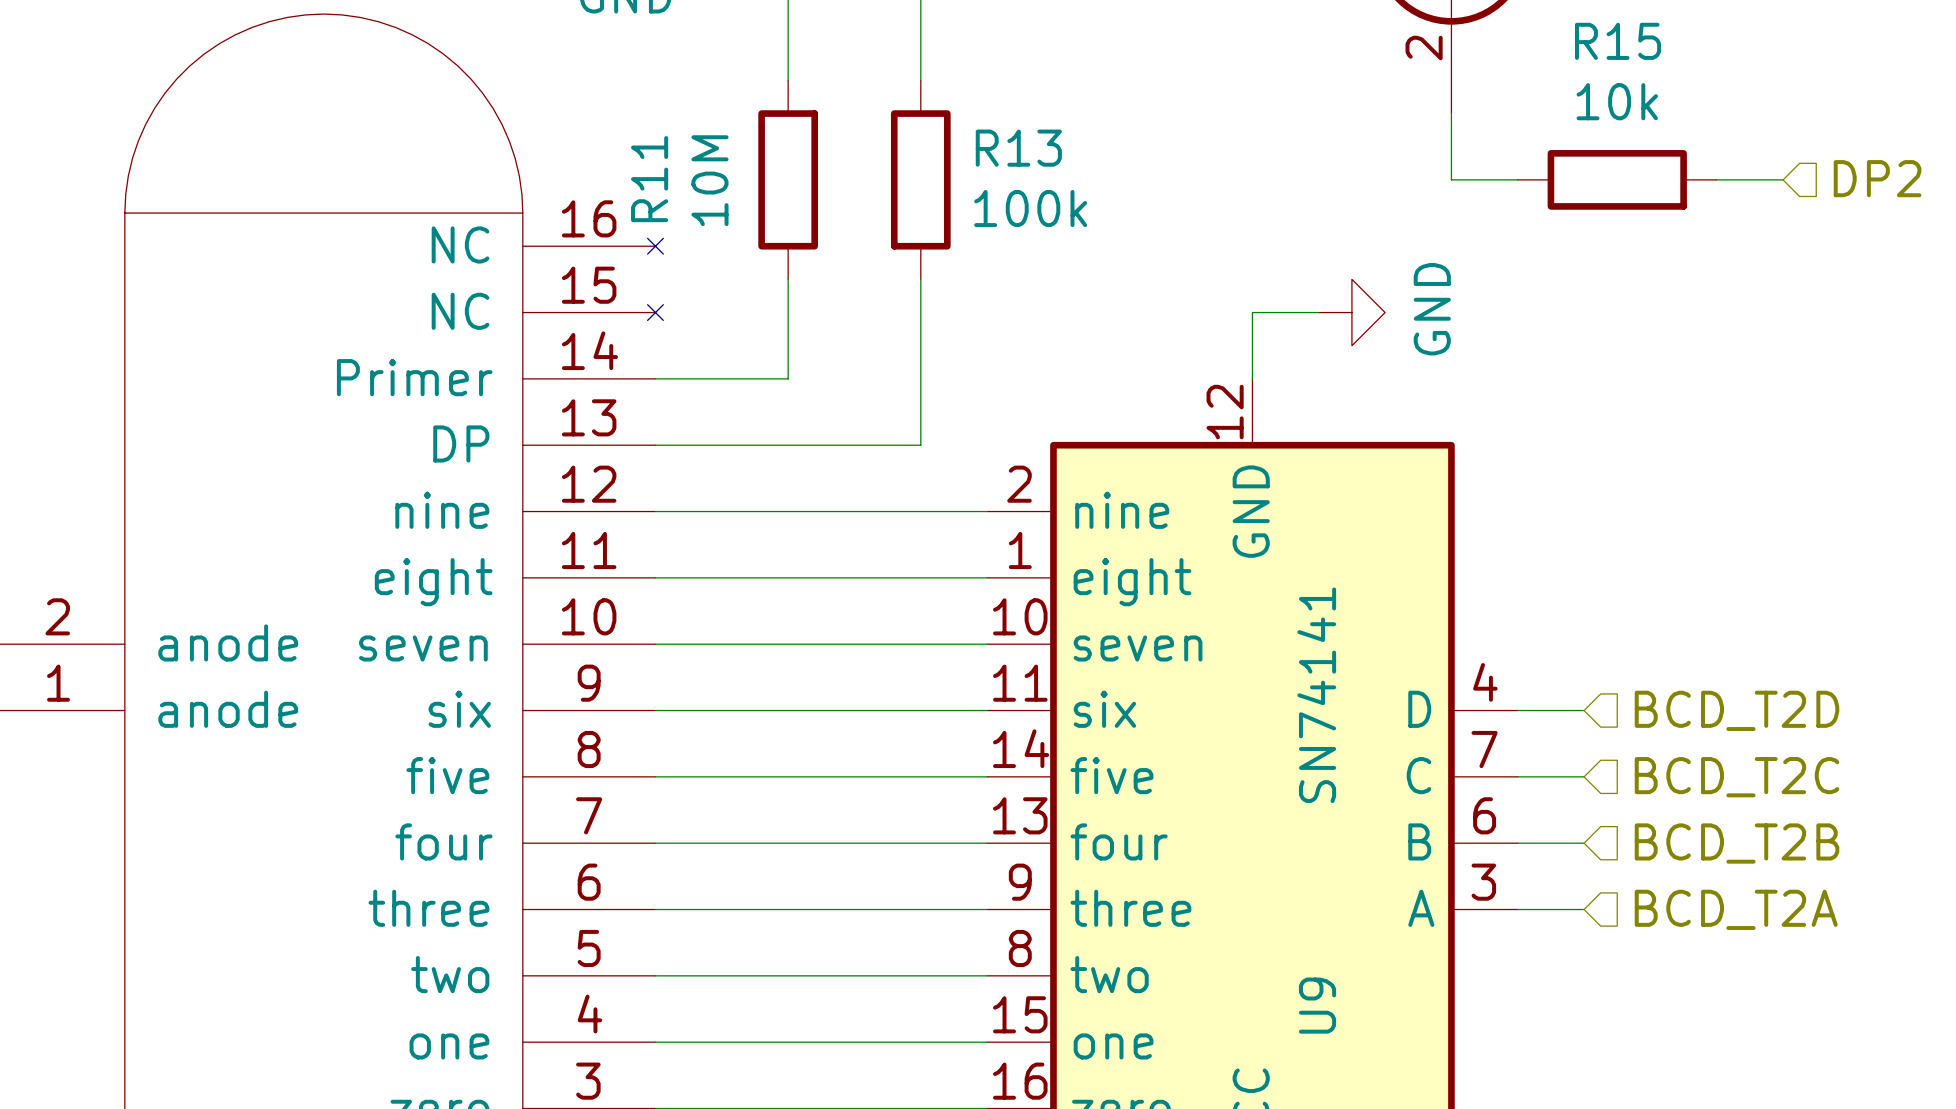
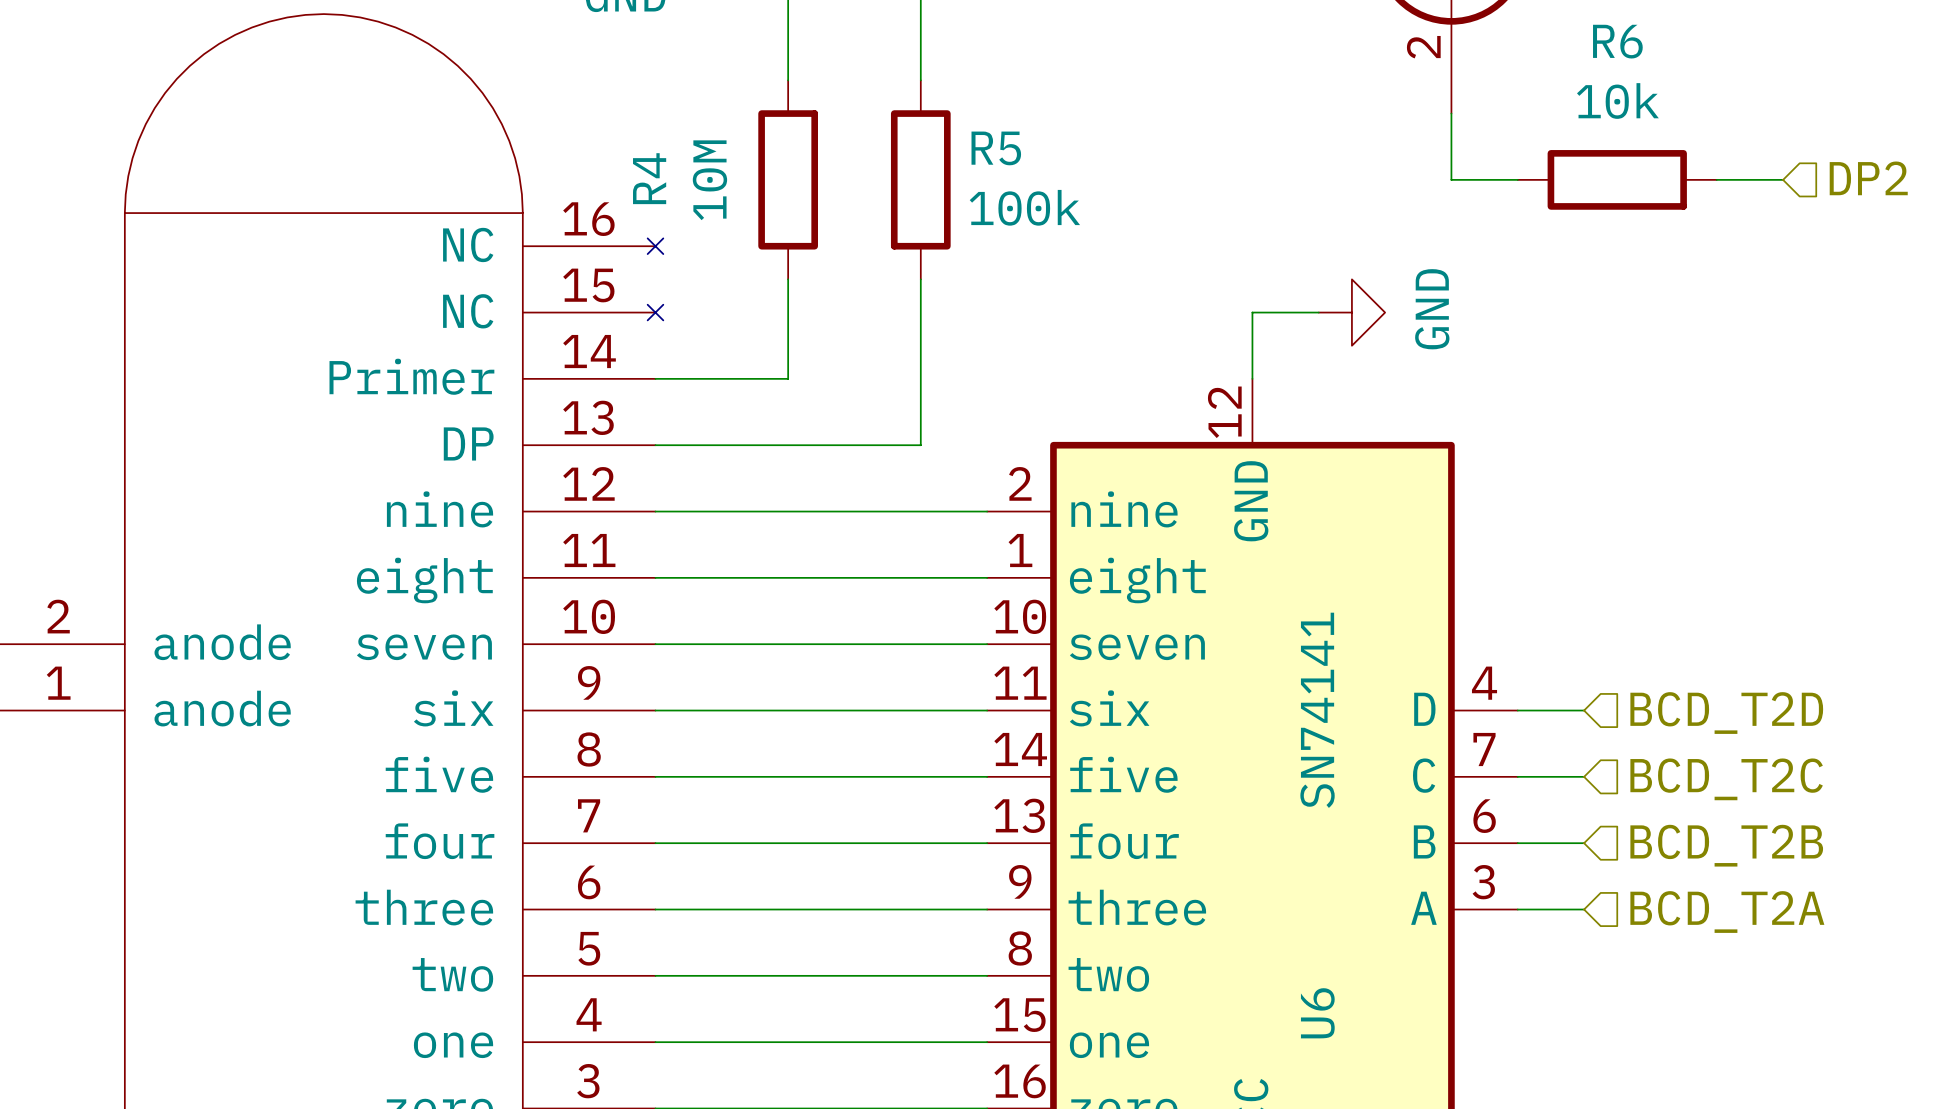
R15 name: R15 (1618, 41) -> R6 (1617, 41)
R13 name: R13 (1018, 148) -> R5 (996, 148)
R11 name: R11 (649, 179) -> R4 (649, 178)
U9 name: U9 (1317, 1005) -> U6 (1317, 1013)

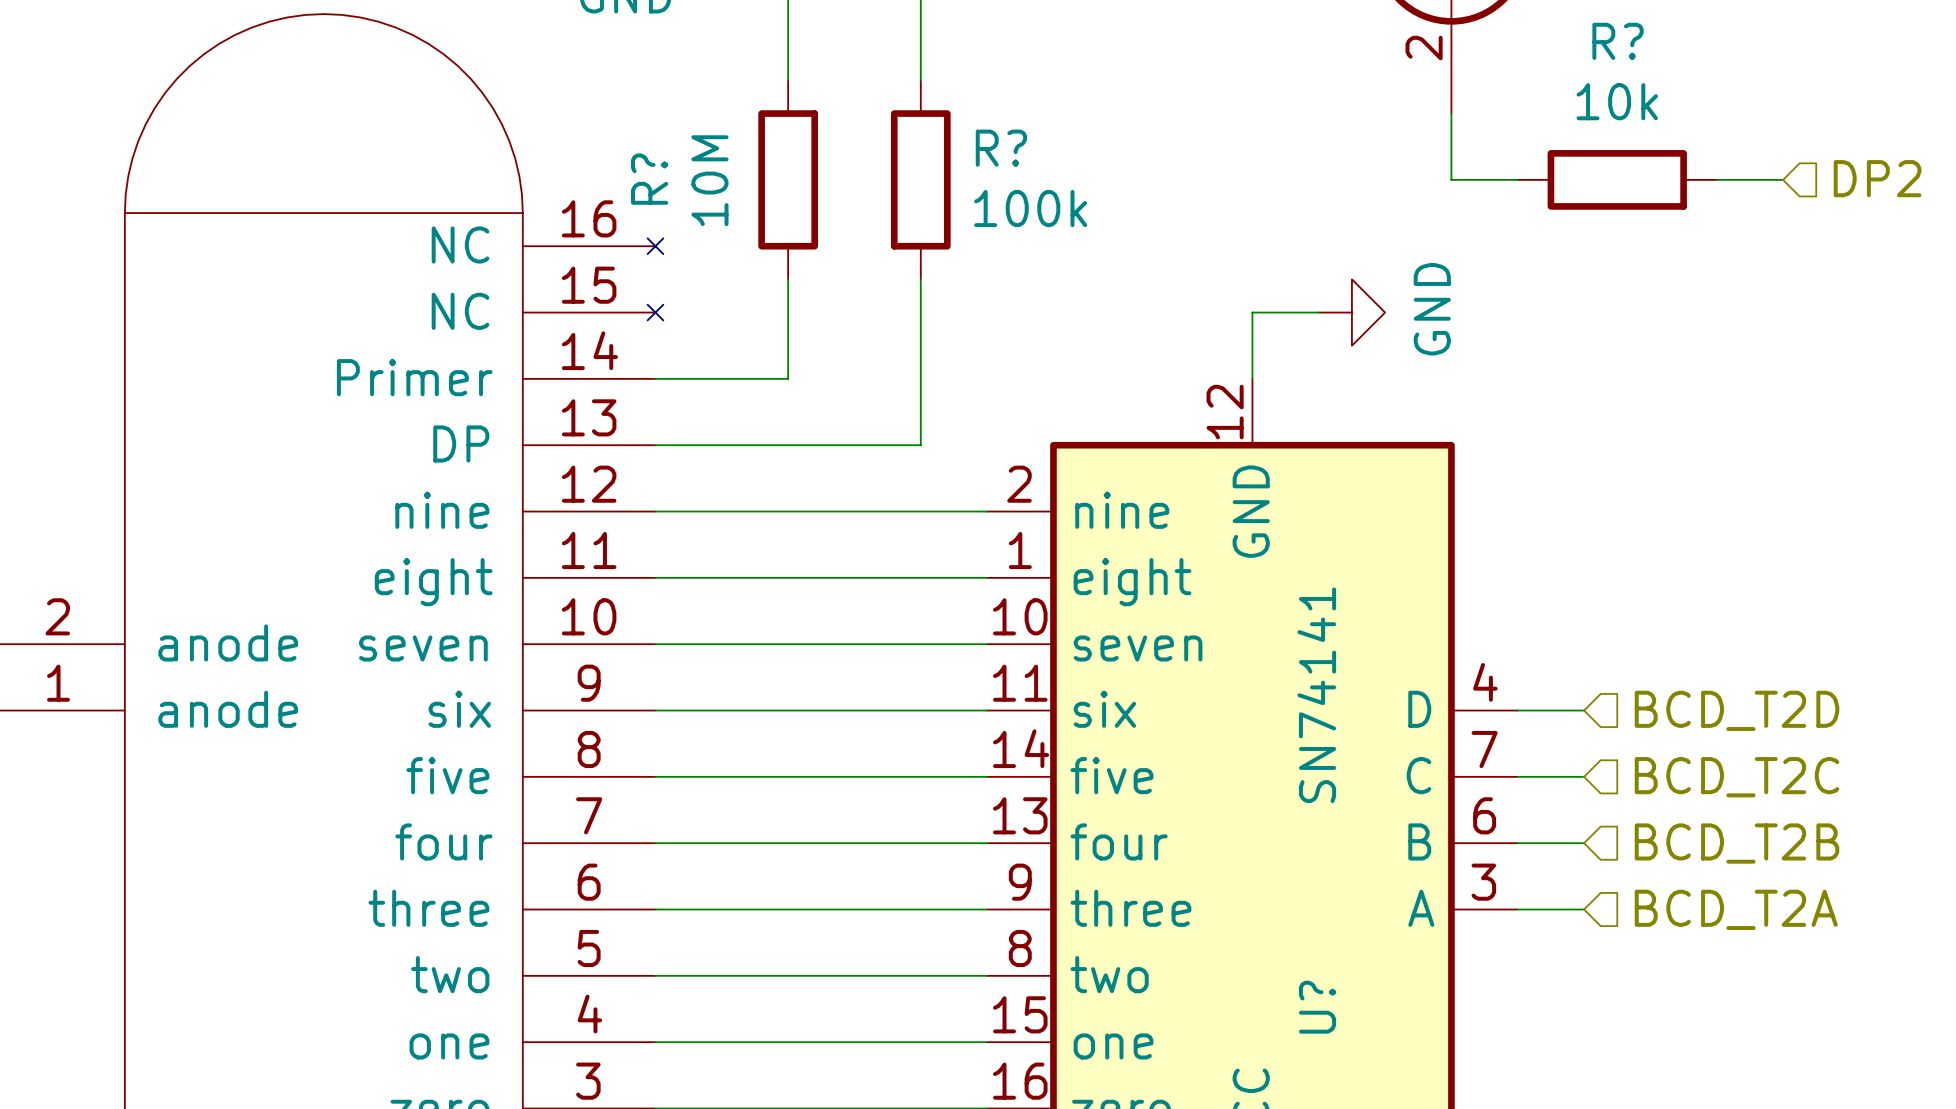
R6 name: R6 (1617, 41) -> R? (1618, 41)
R5 name: R5 (996, 148) -> R? (1001, 148)
R4 name: R4 (649, 178) -> R? (649, 179)
U6 name: U6 (1317, 1013) -> U? (1317, 1007)

